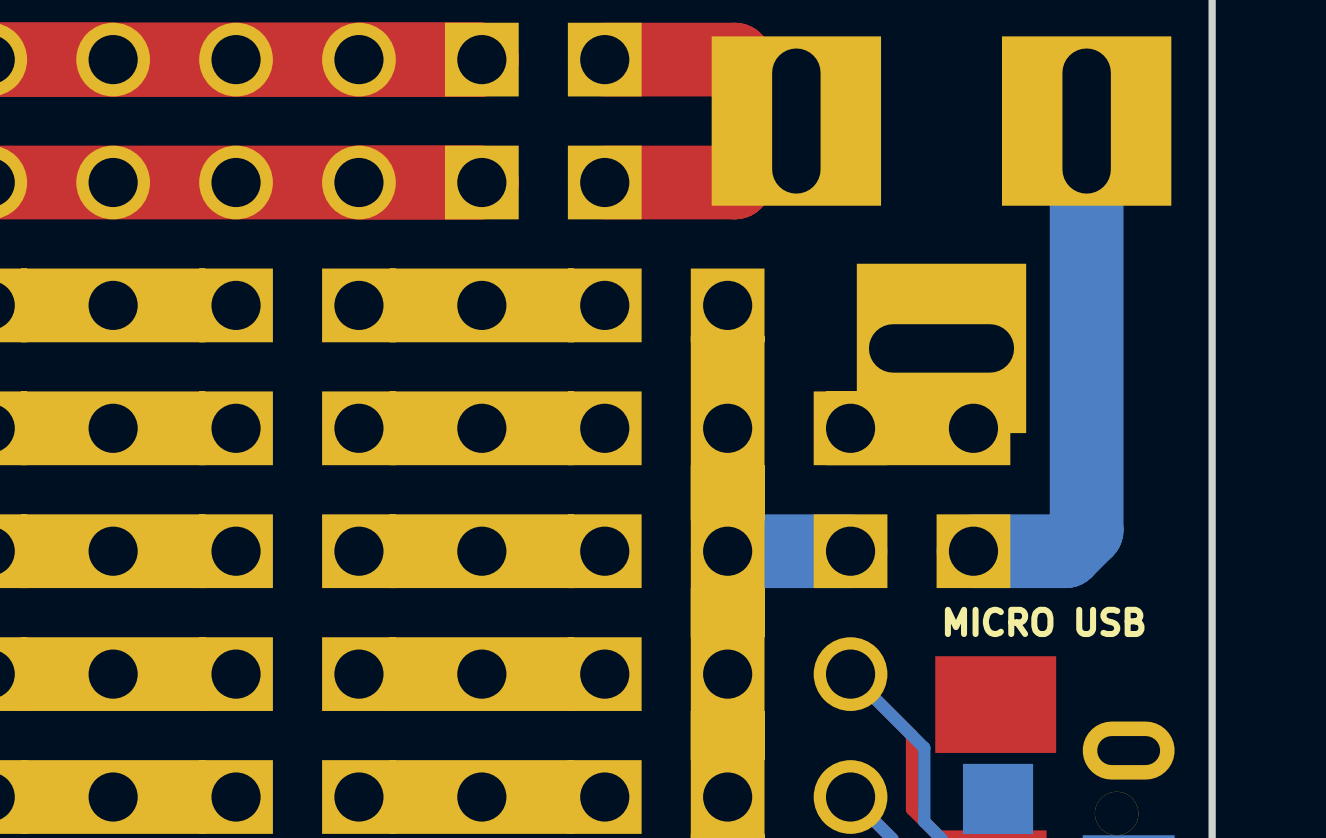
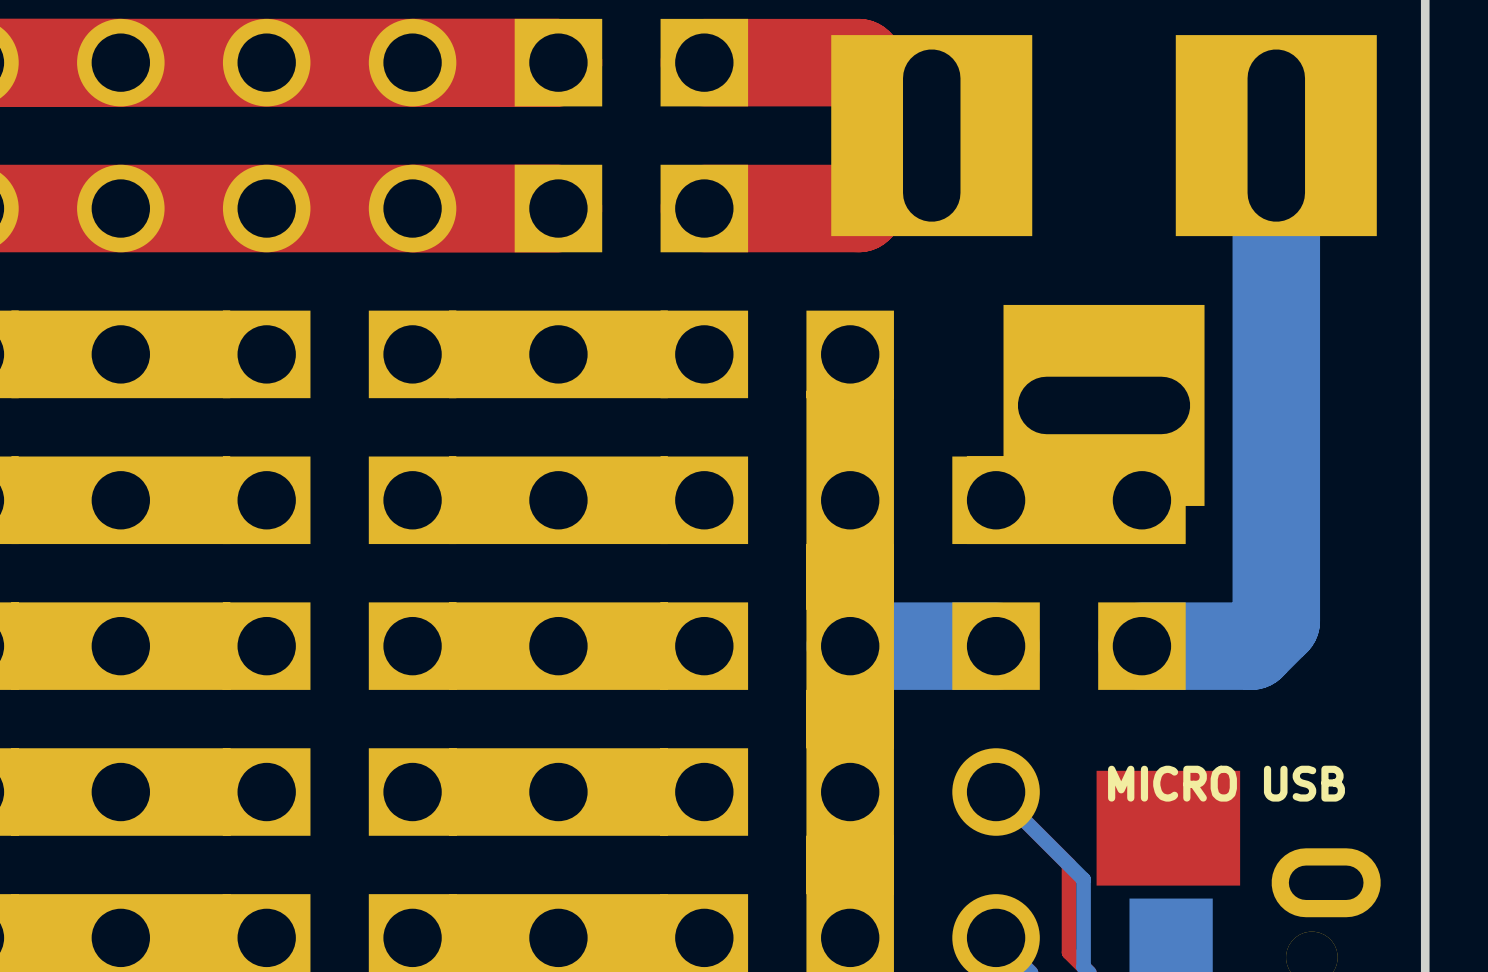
text position: MICRO USB (1044, 621) -> MICRO USB (1226, 783)

